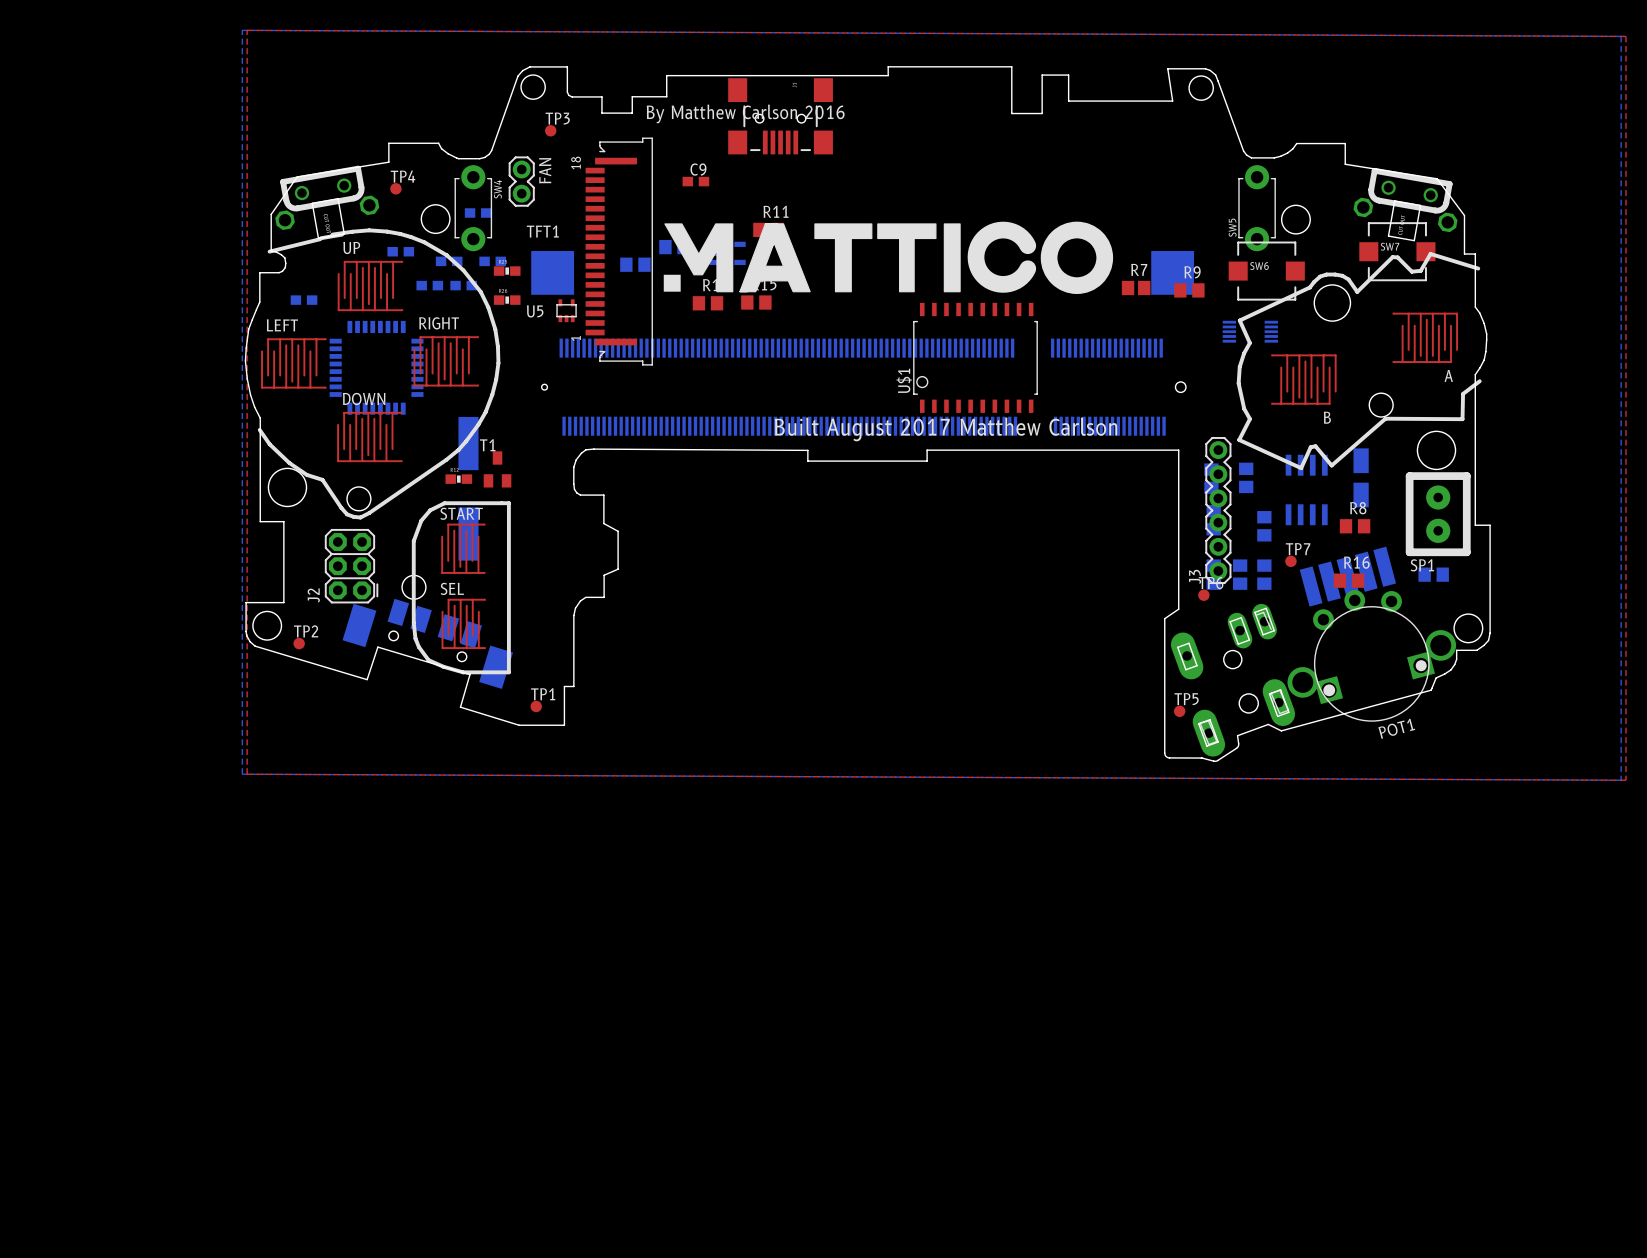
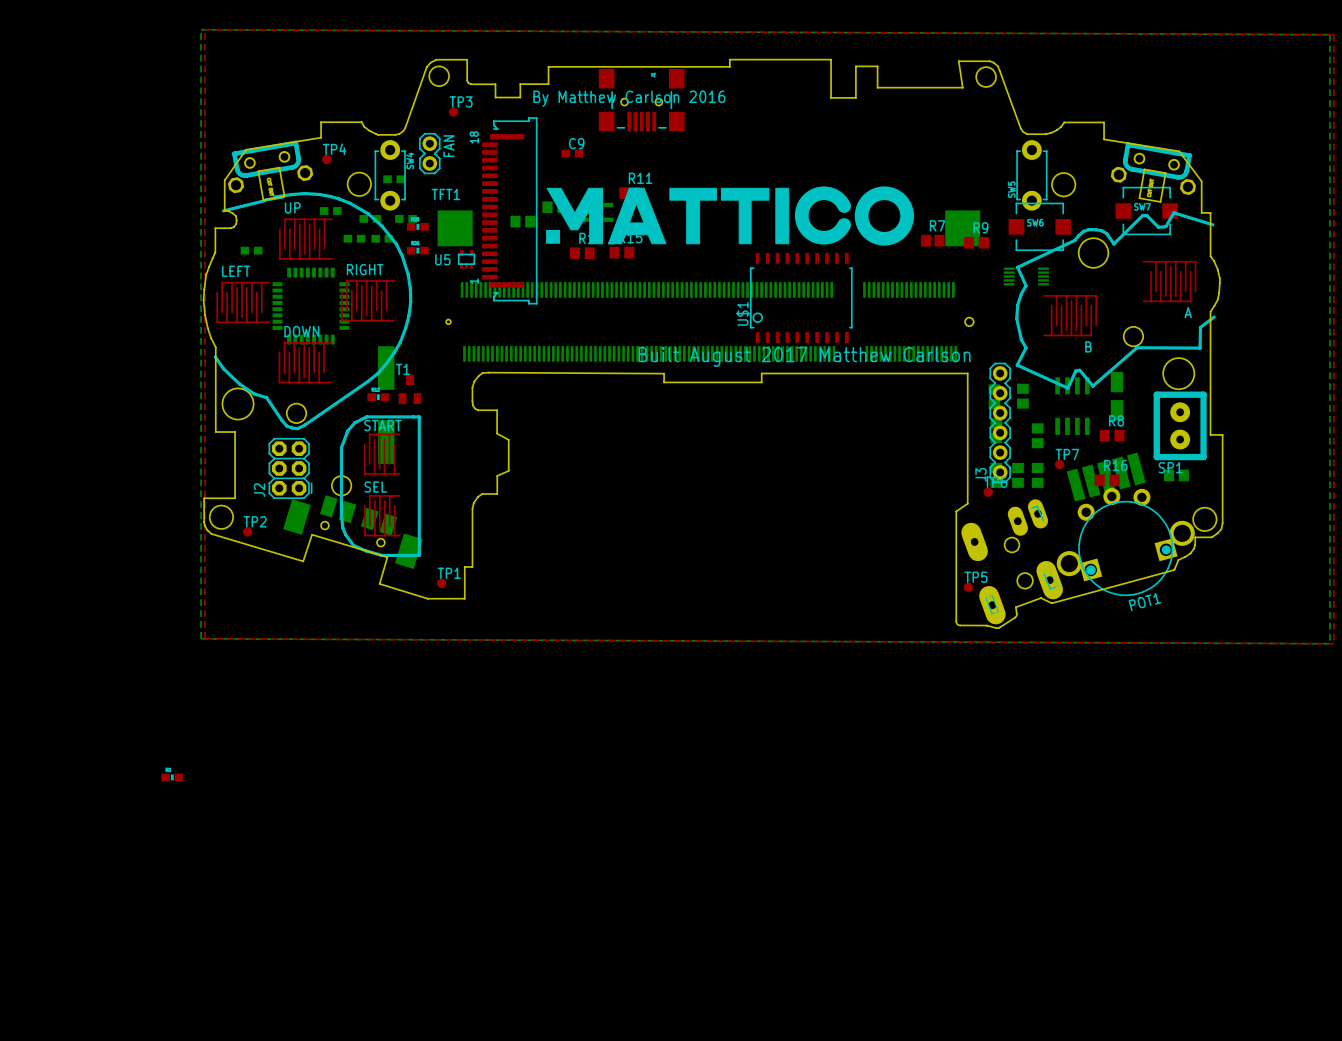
part: none -> (172, 777)

